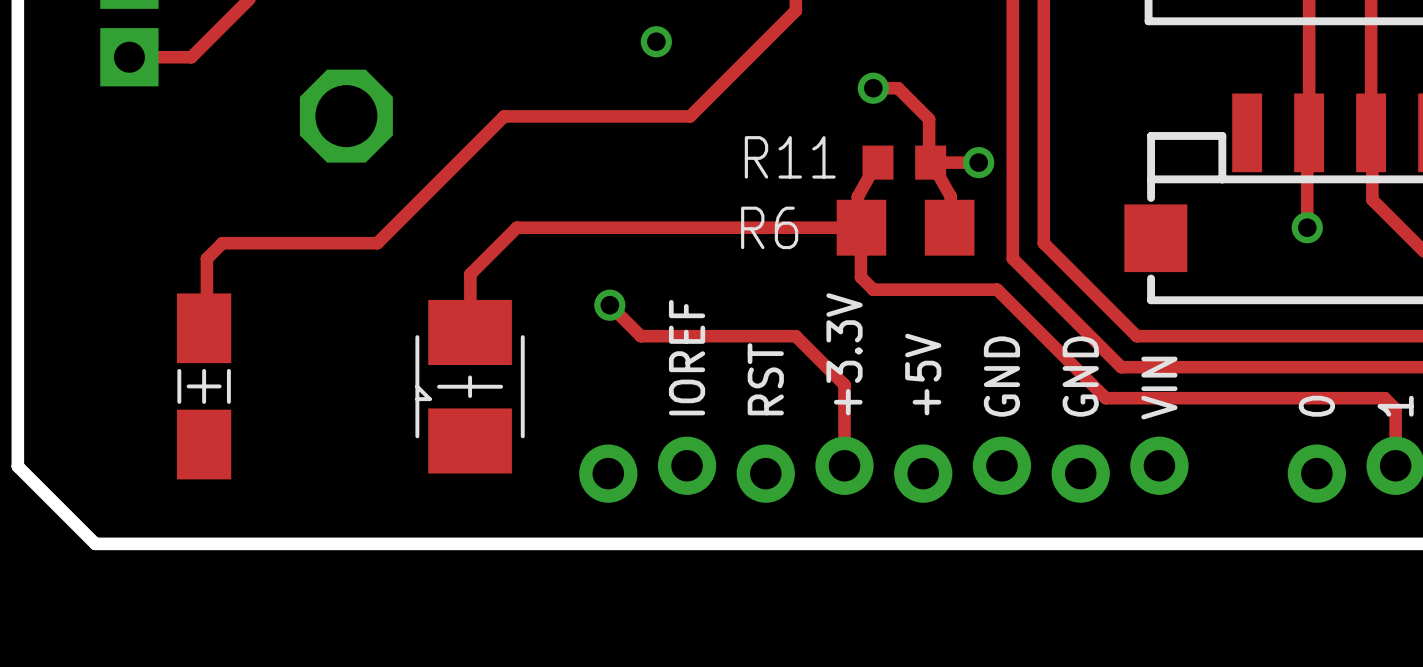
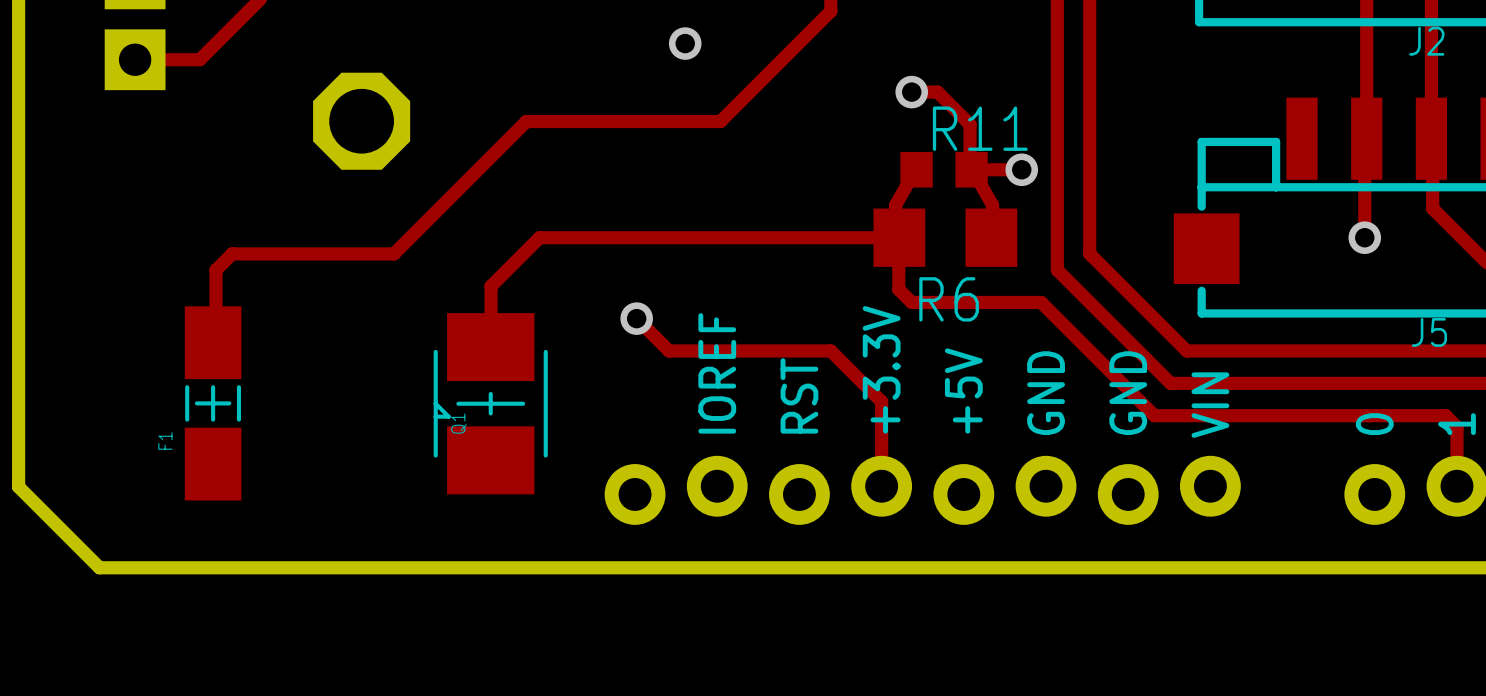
J2 name: none -> J2 (1426, 41)
R11 name position: R11 (790, 157) -> R11 (980, 128)
R6 name position: R6 (769, 227) -> R6 (949, 299)
J5 name: none -> J5 (1429, 332)
Q1 name: none -> Q1 (458, 423)
F1 name: none -> F1 (165, 441)

